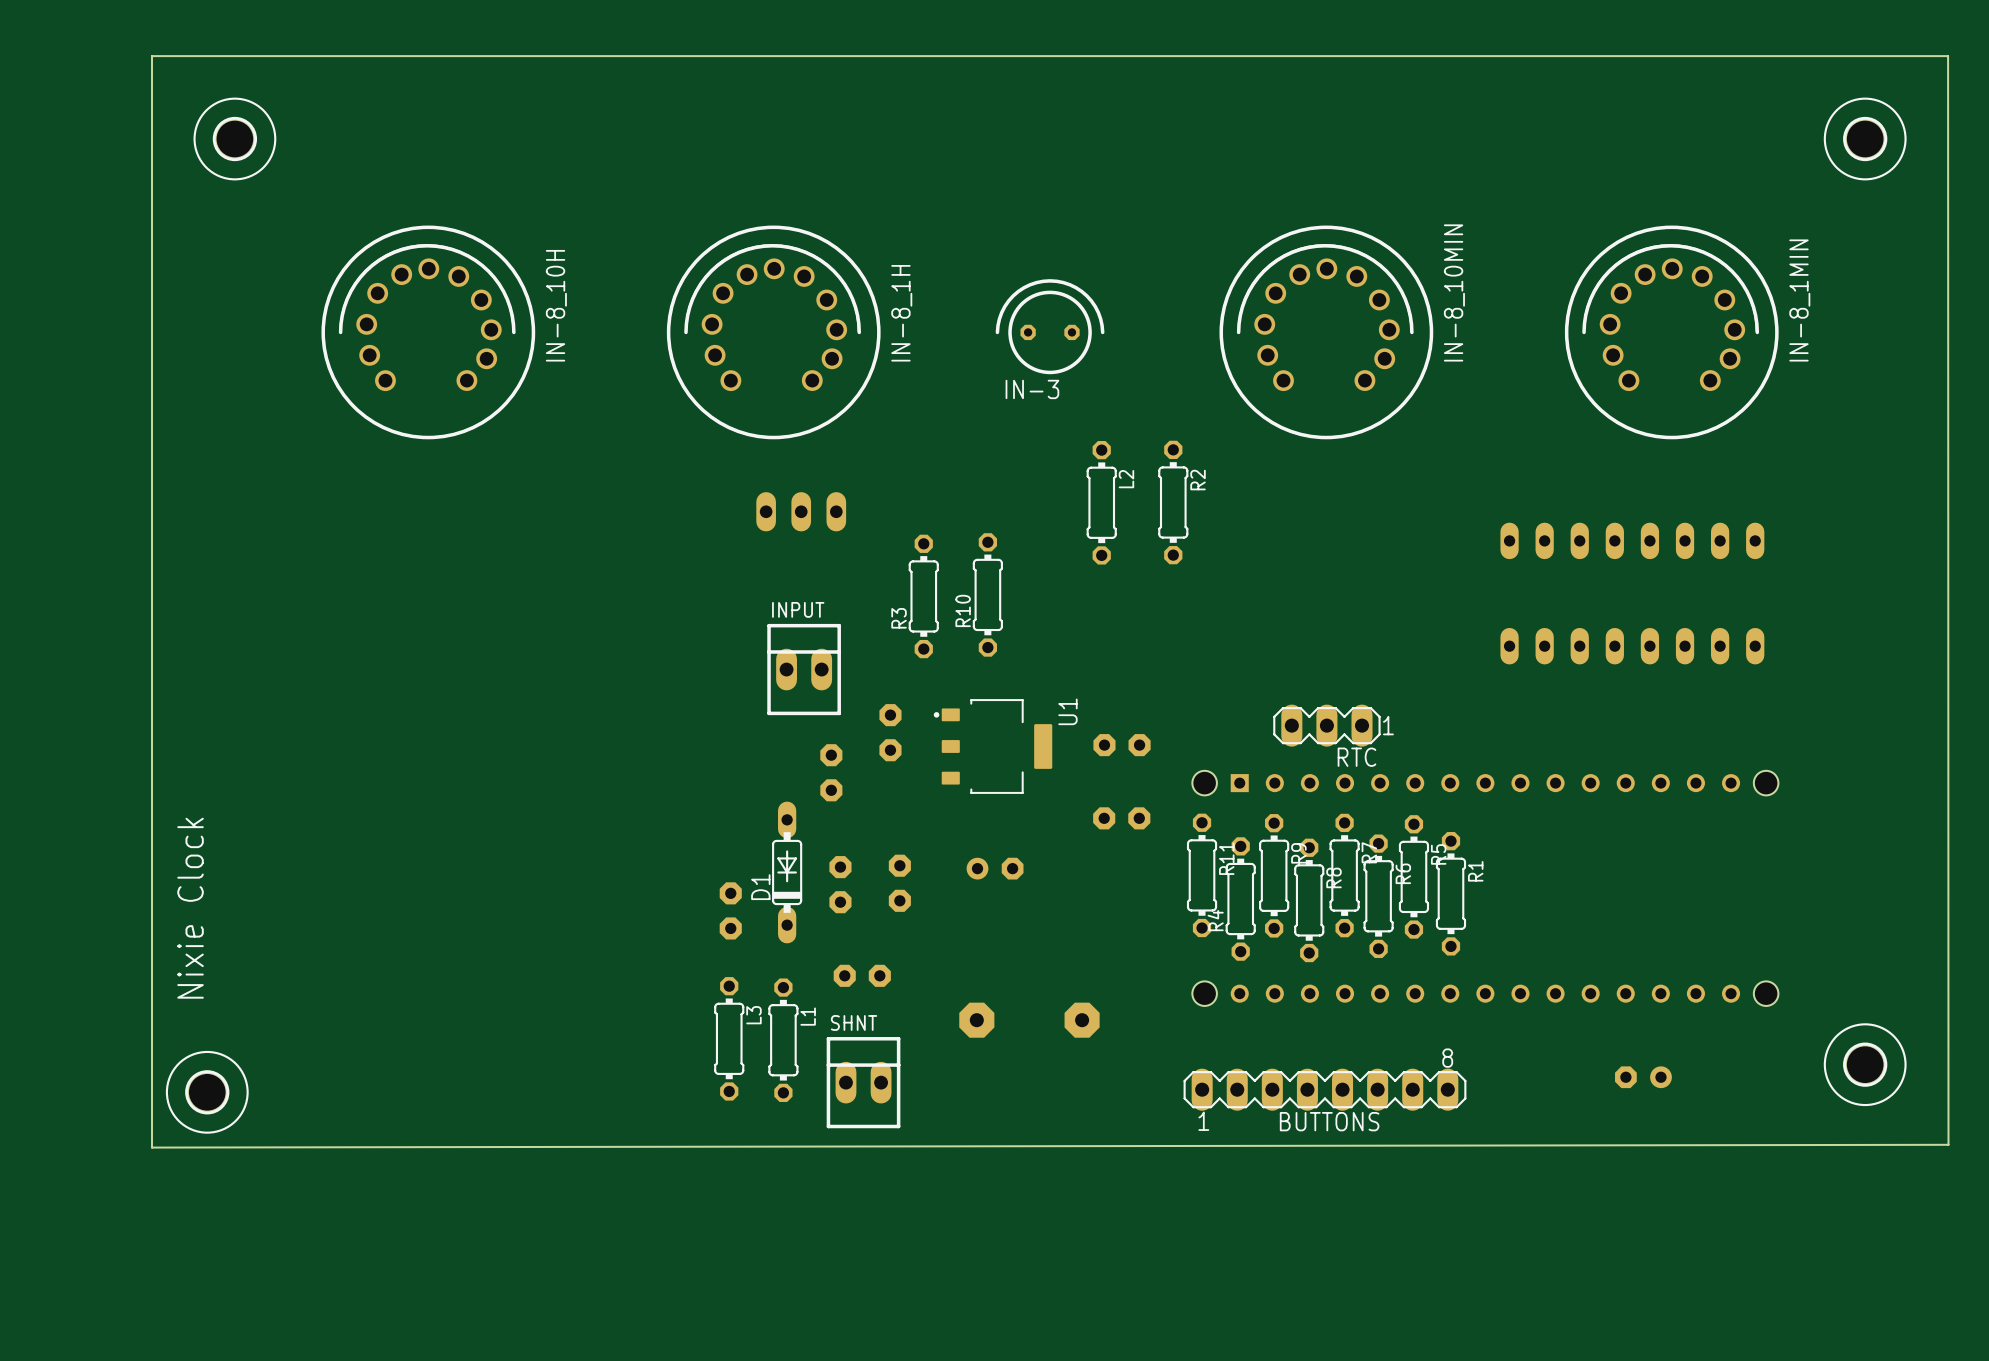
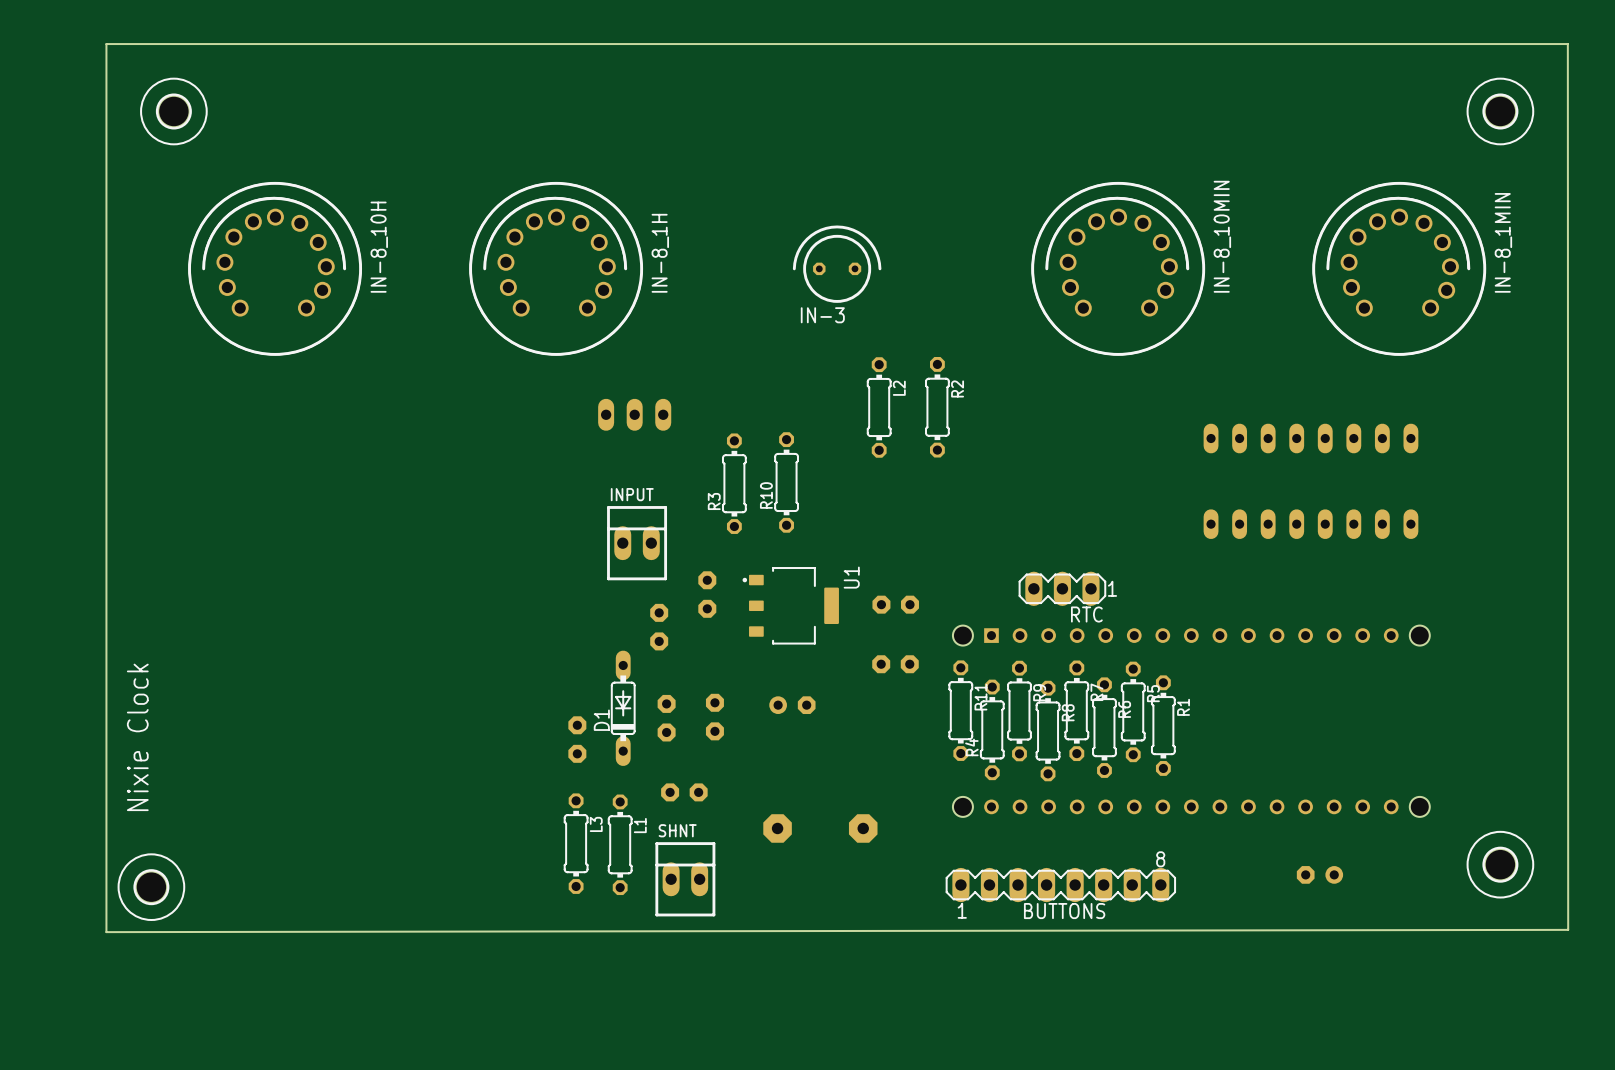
IN-8_10H position: (428, 332) -> (275, 268)
IN-8_1H position: (773, 332) -> (556, 268)
IN-8_10MIN position: (1326, 332) -> (1118, 268)
IN-8_1MIN position: (1671, 332) -> (1399, 268)

